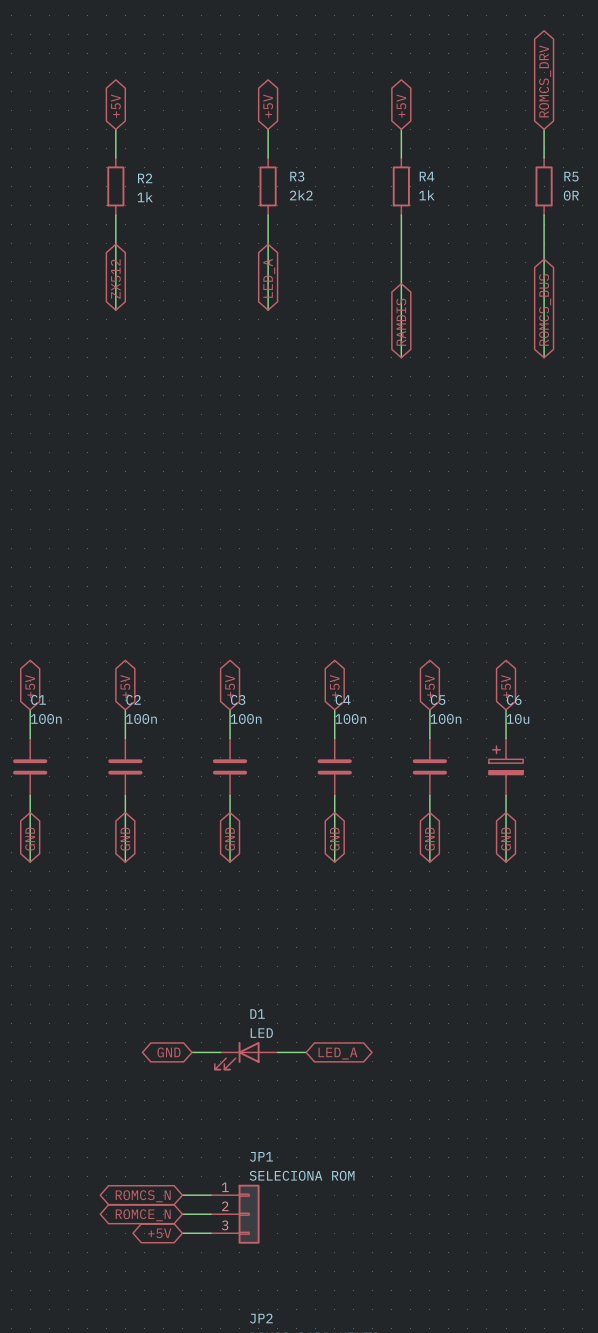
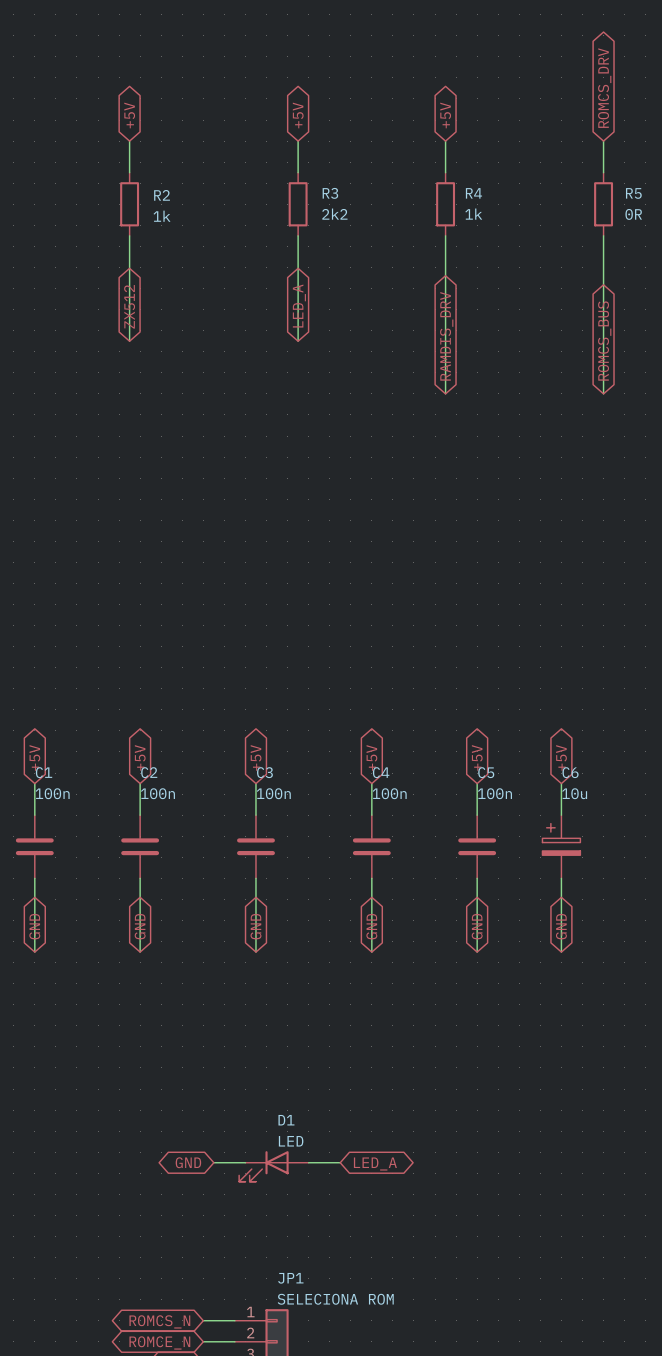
global label: RAMDIS (401, 322) -> RAMDIS_DRV (446, 336)

